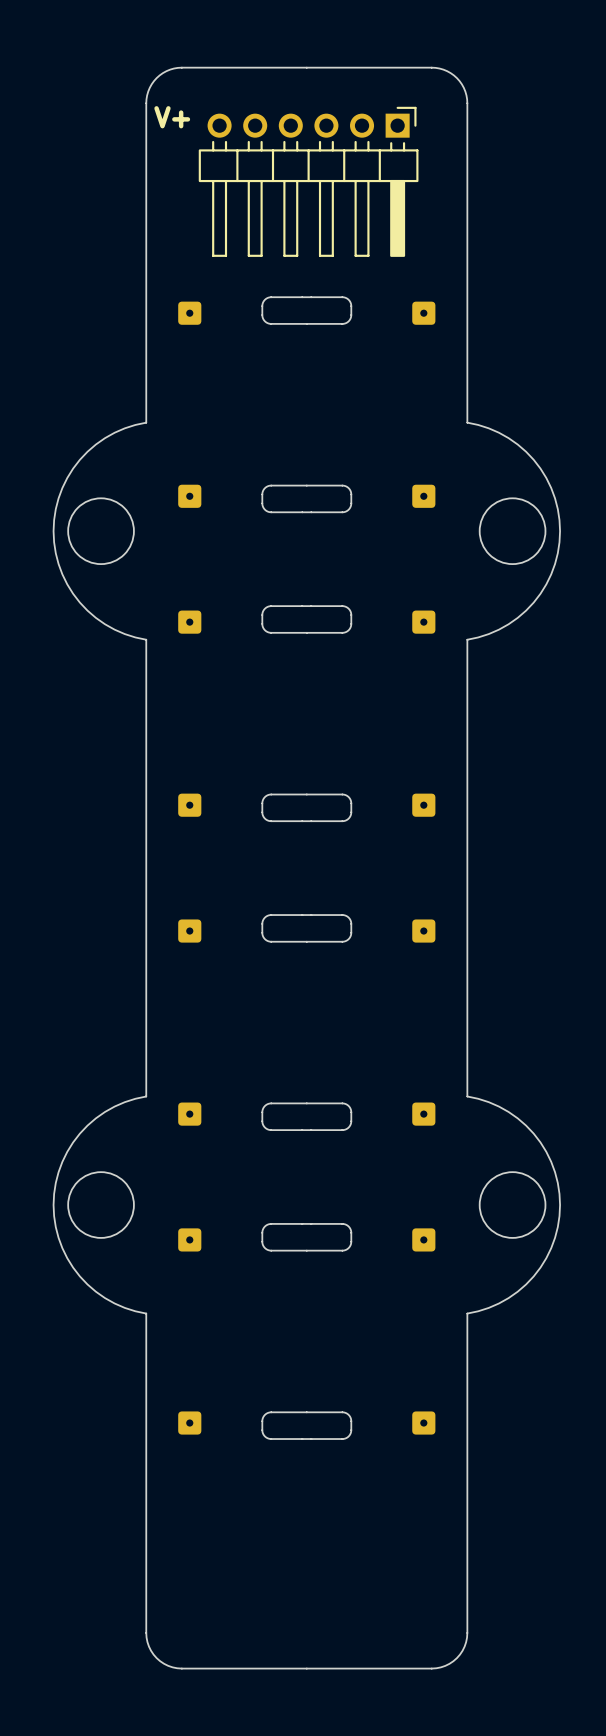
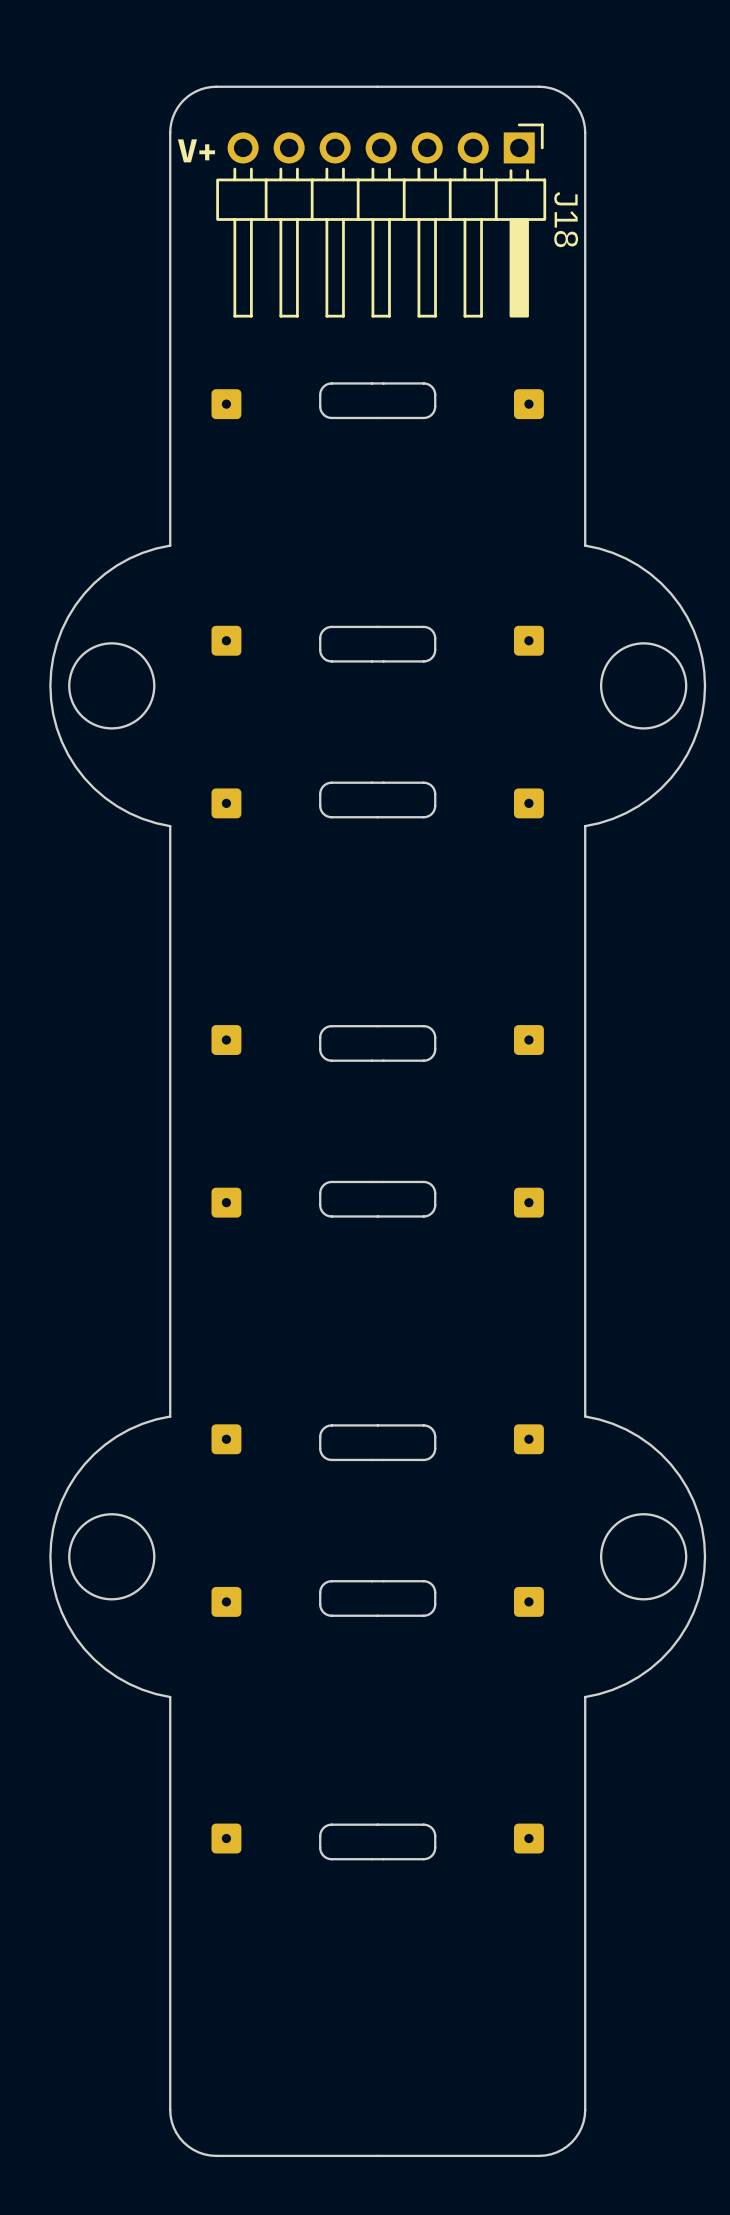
J18: none -> (381, 220)
part: (308, 181) -> none

